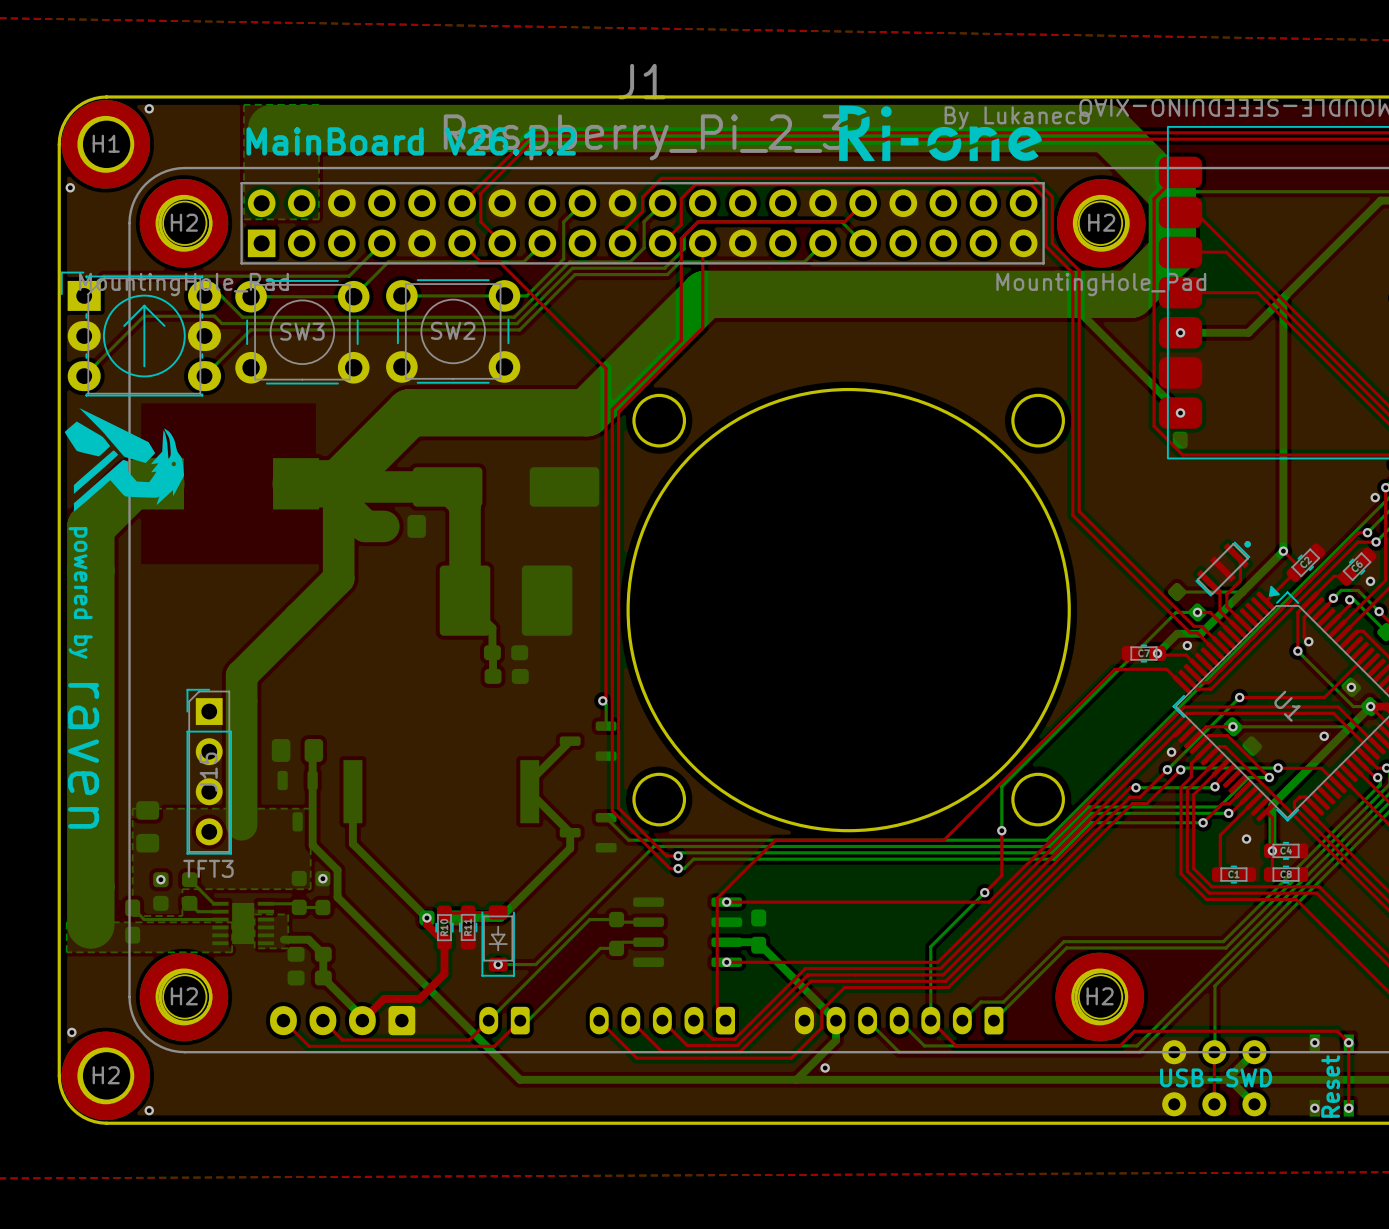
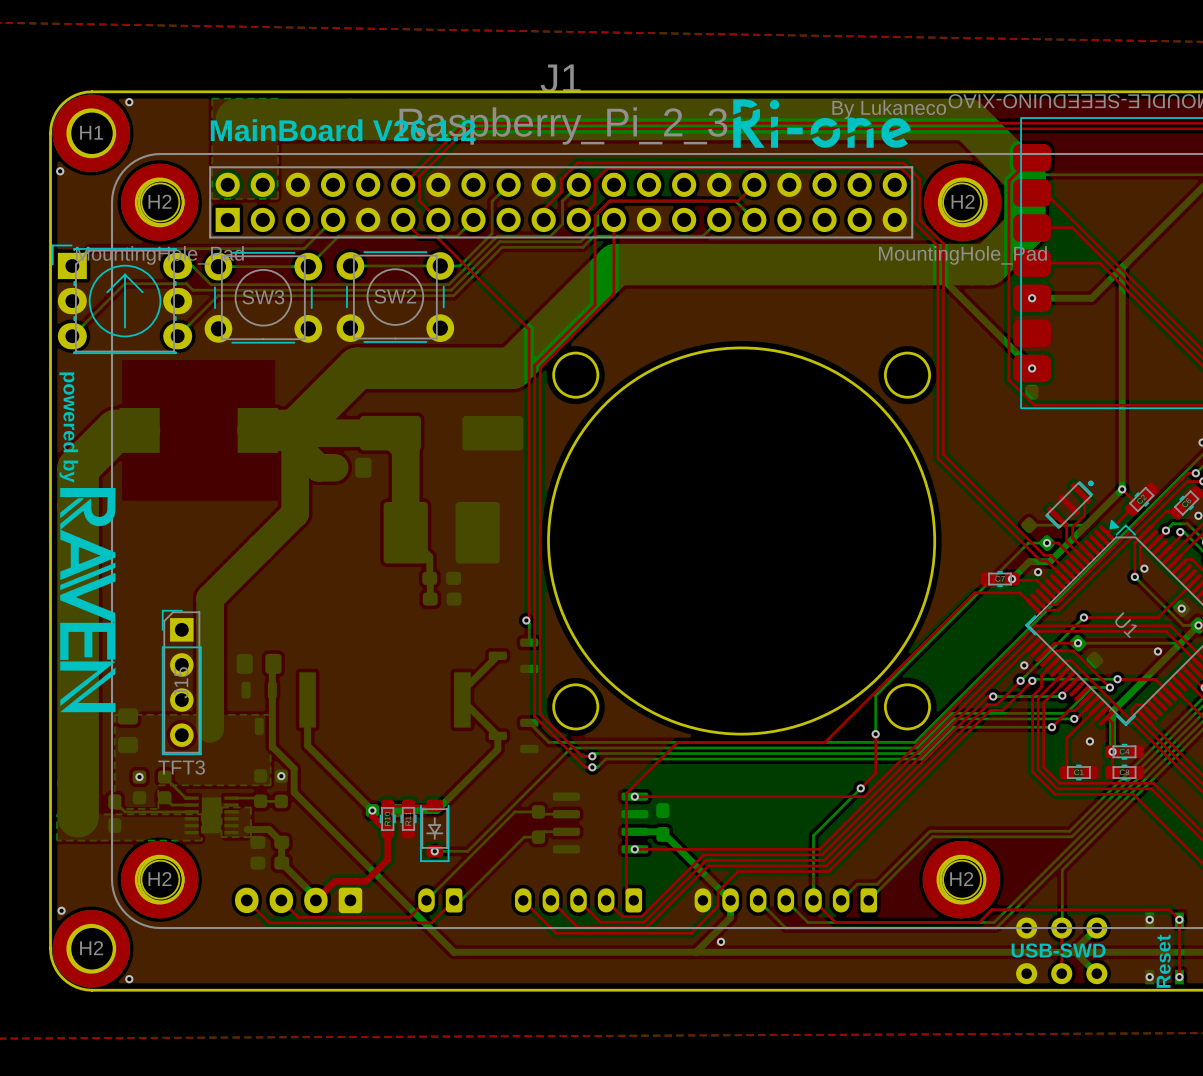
drawing: [64, 408, 185, 512] -> none
drawing: none -> [60, 488, 116, 713]
text position: powered by (80, 593) -> powered by (68, 427)
text: raven (83, 755) -> none

